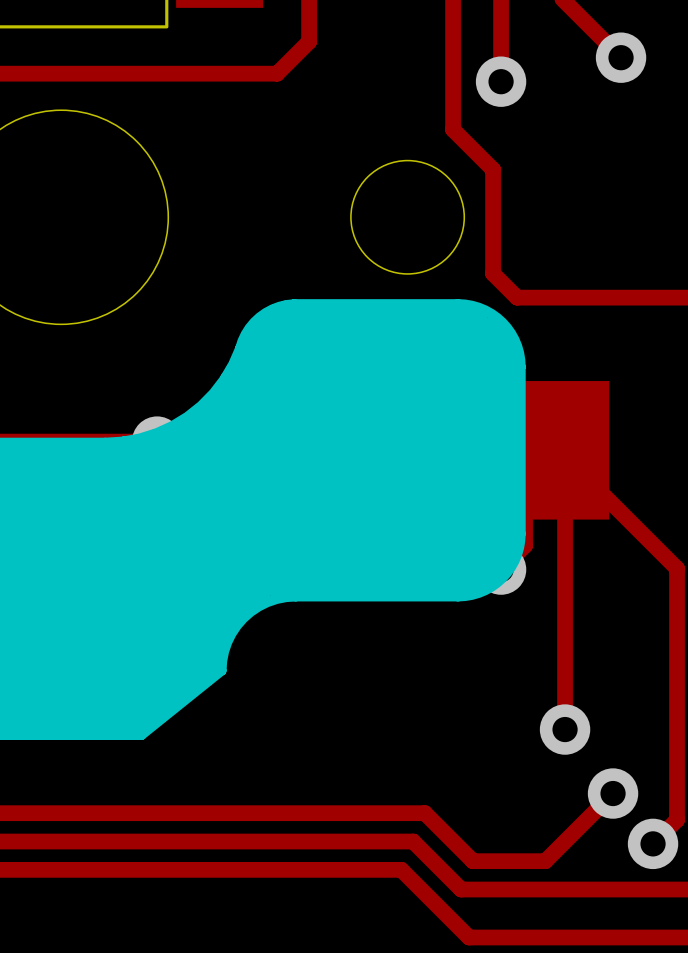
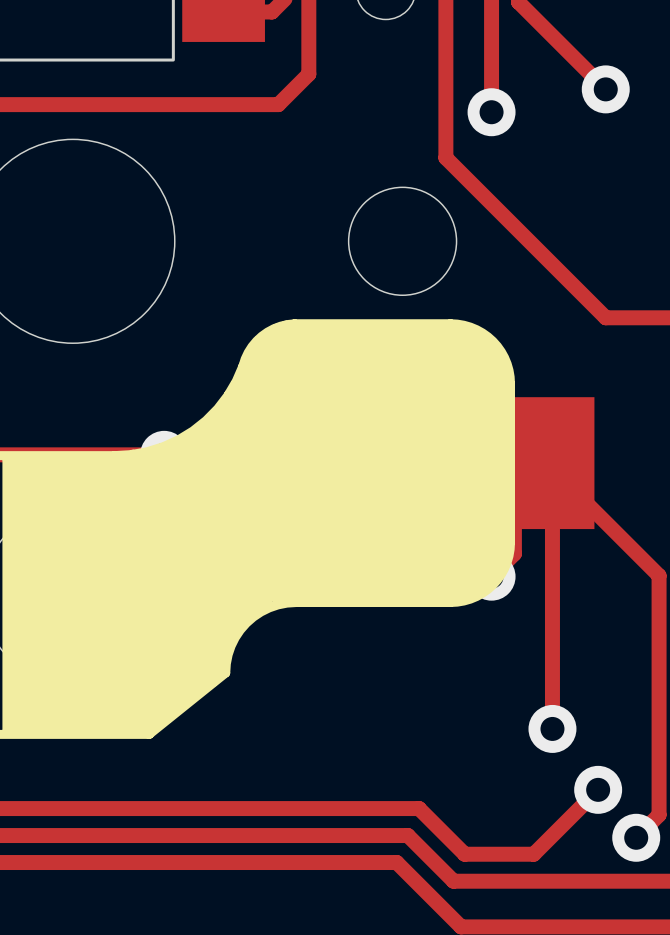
track: (493, 169) (493, 273) (517, 297) (621, 297) -> (483, 195) (605, 317)

